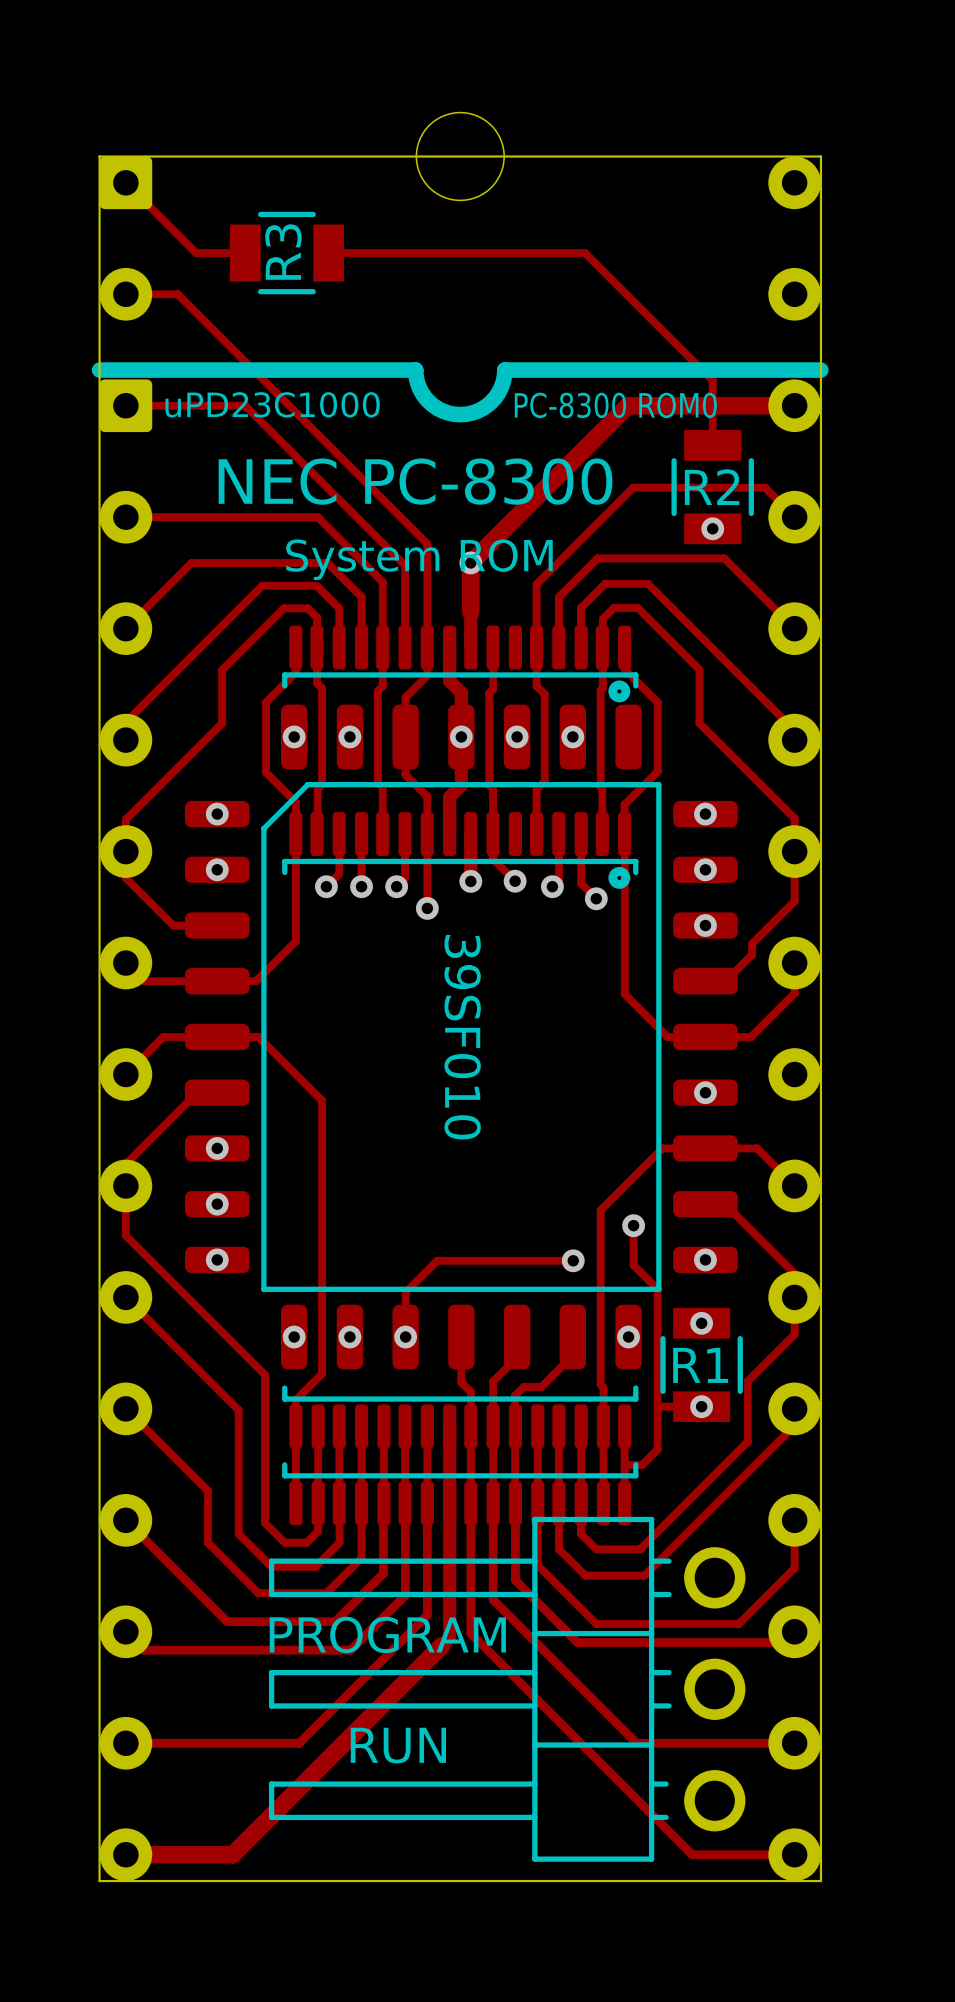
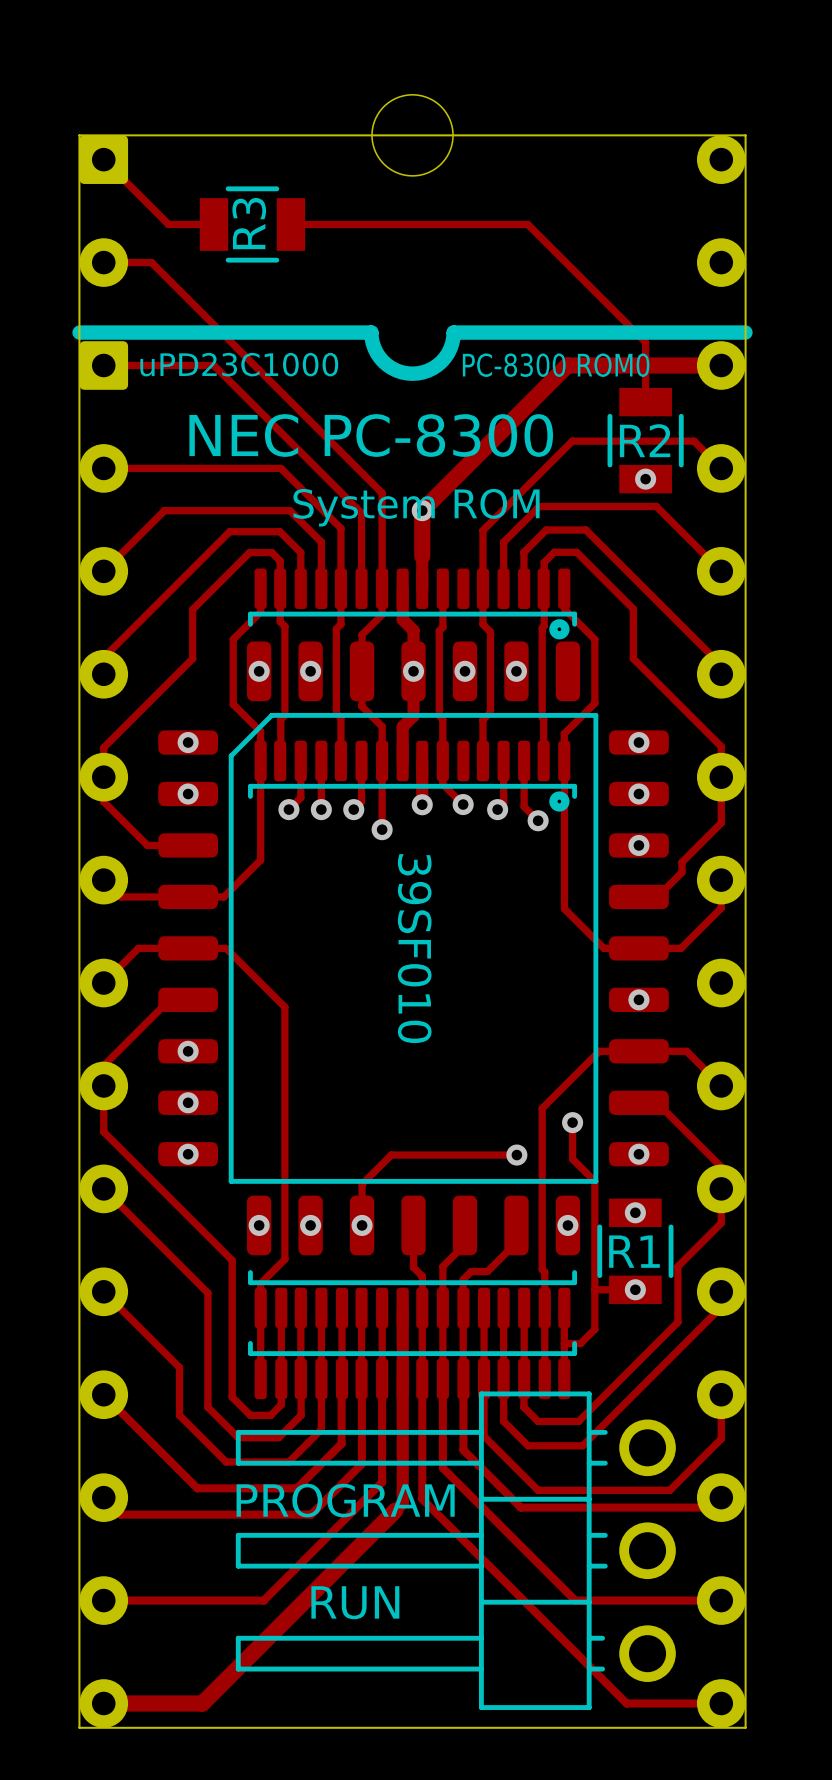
text position: System ROM (419, 559) -> System ROM (416, 507)

